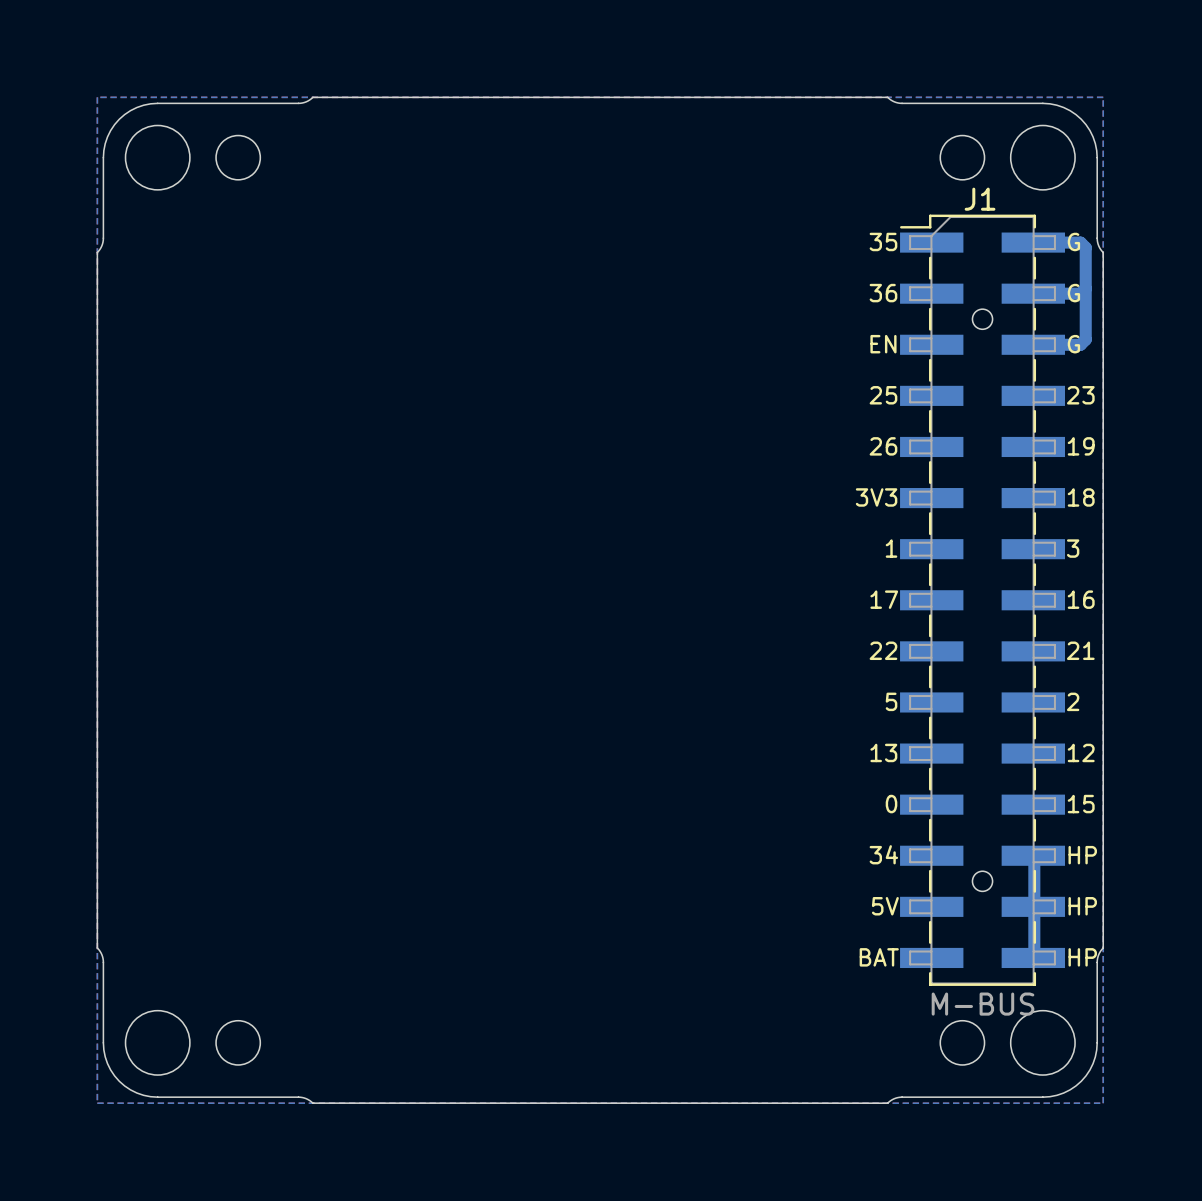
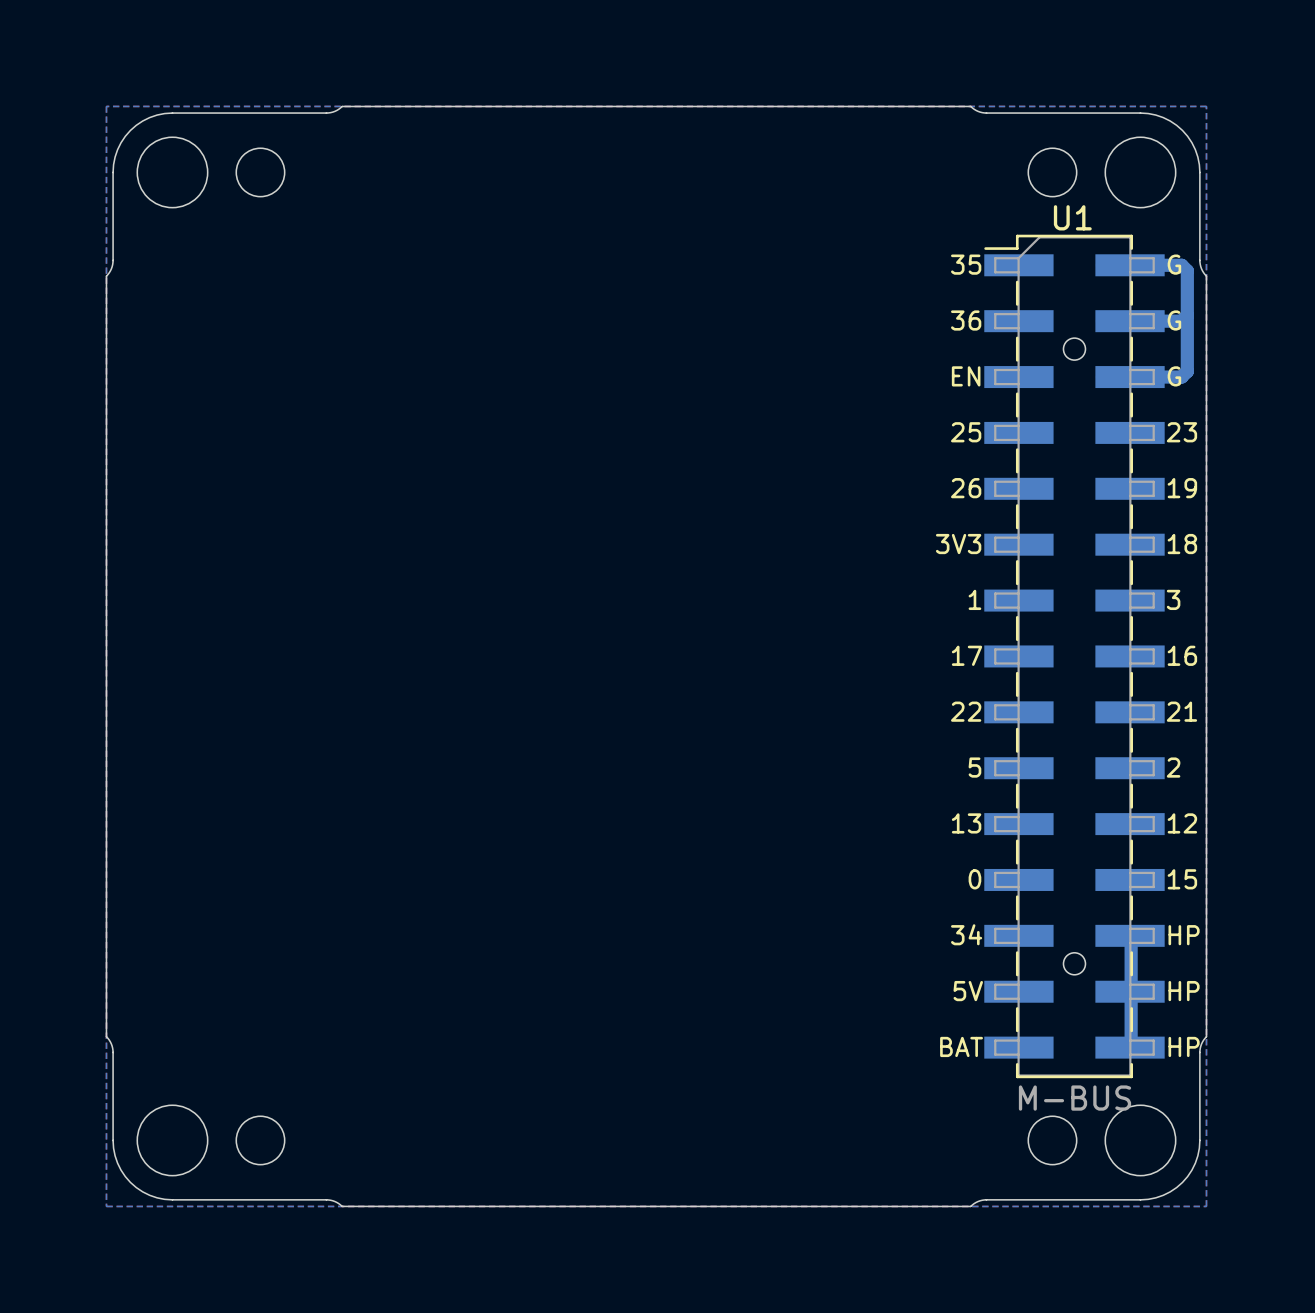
J1 name: J1 (980, 199) -> U1 (1072, 217)

